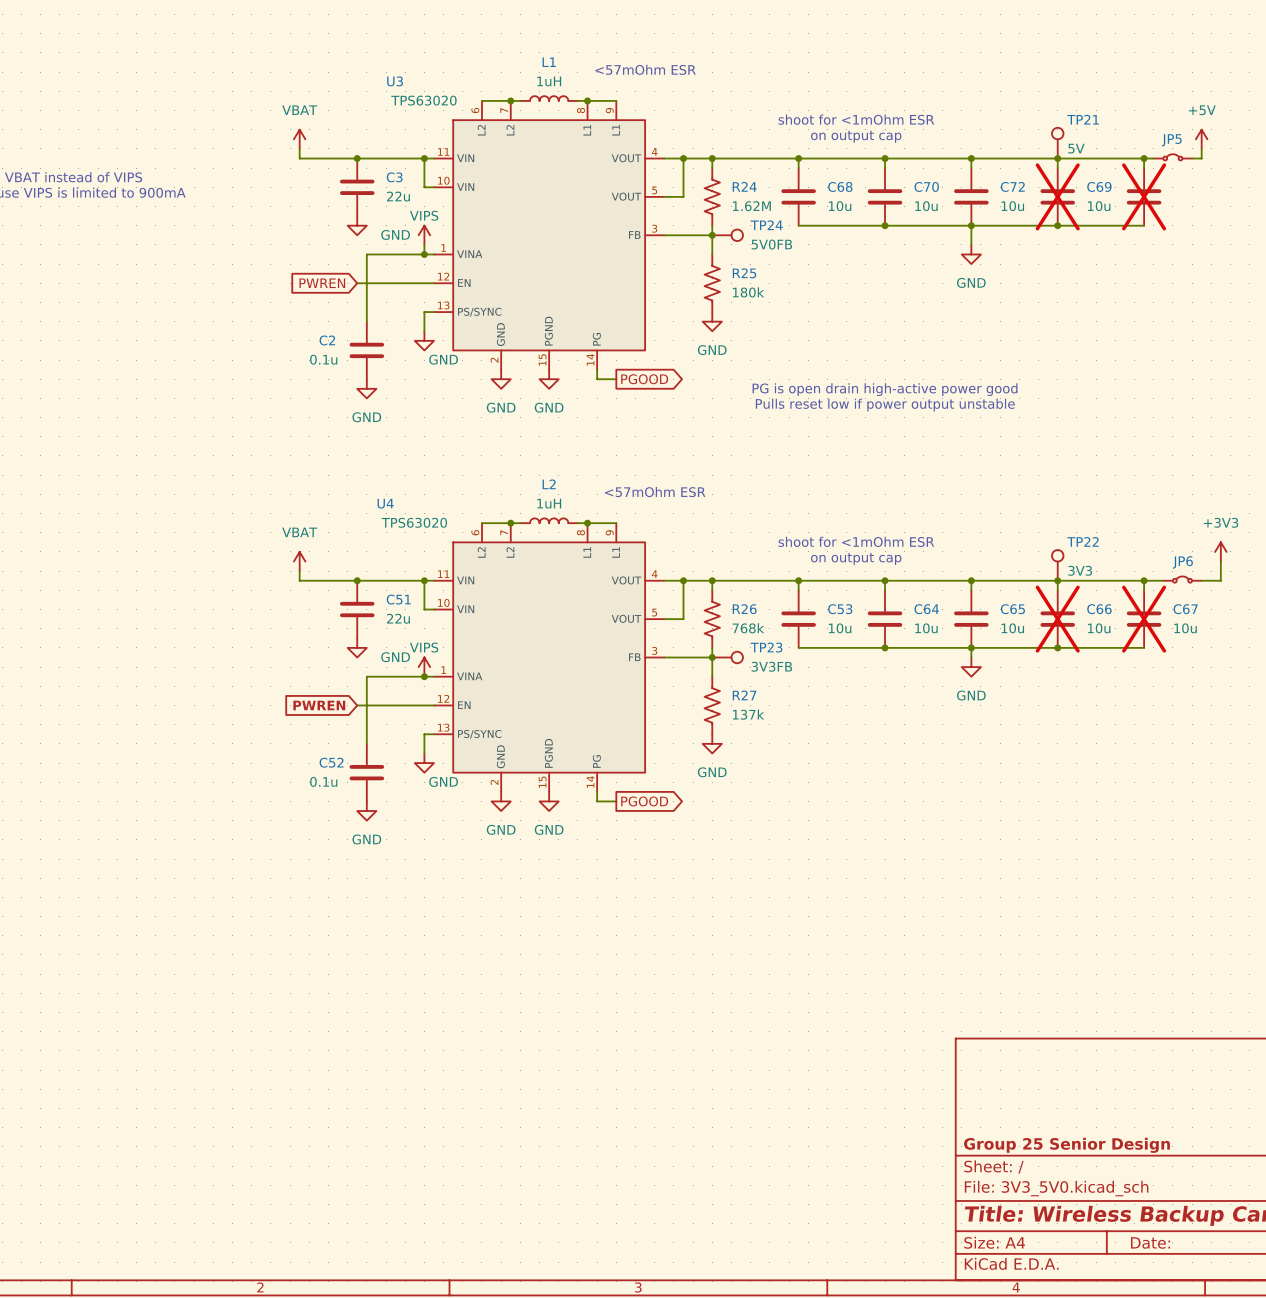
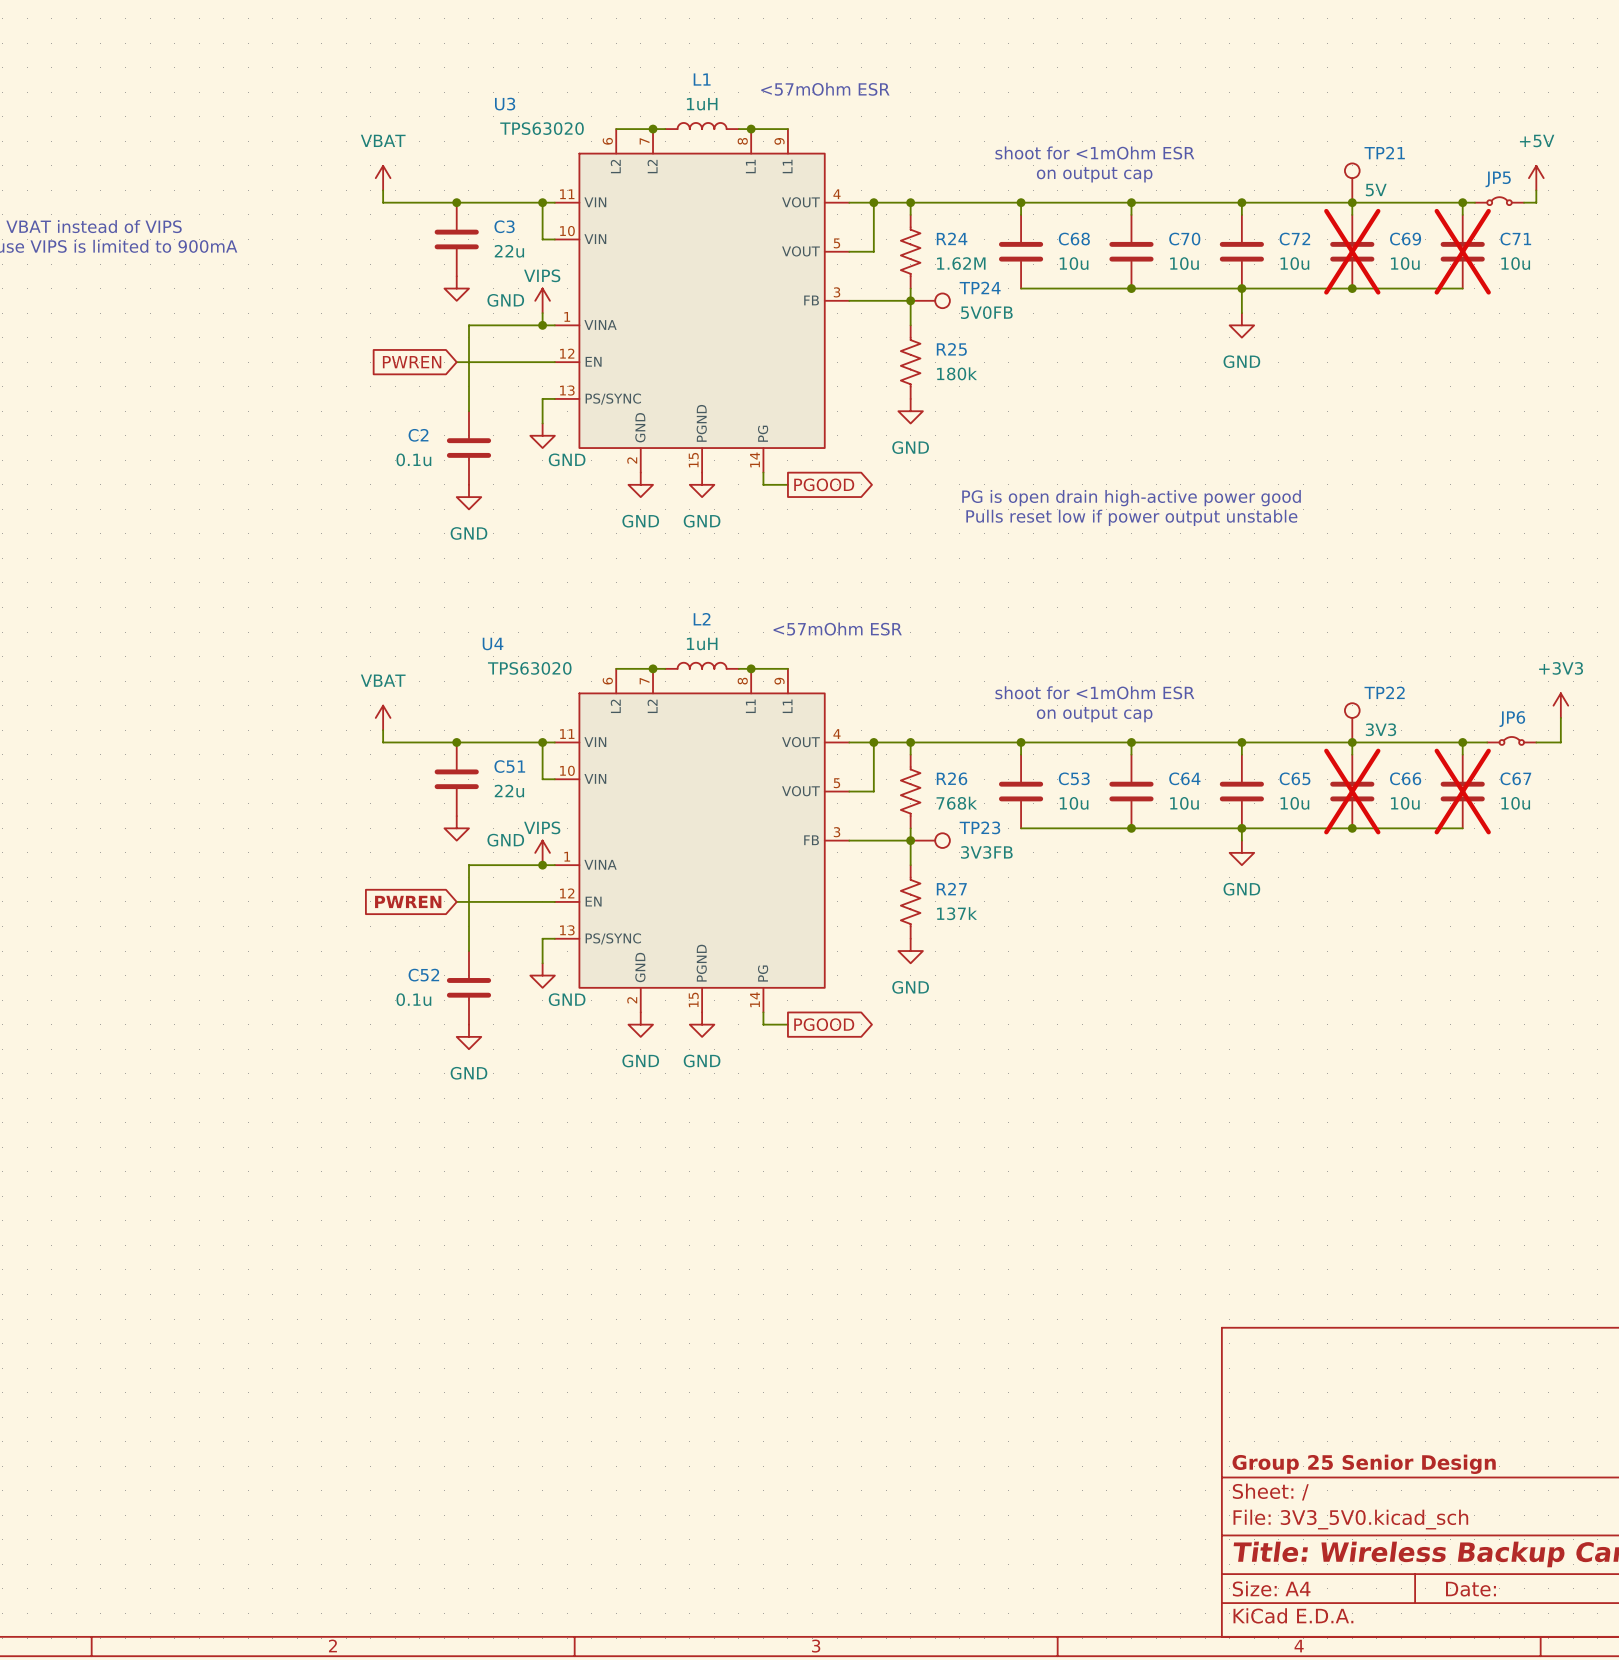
C71 name: none -> C71 (1515, 239)
C71 value: none -> 10u (1515, 263)

